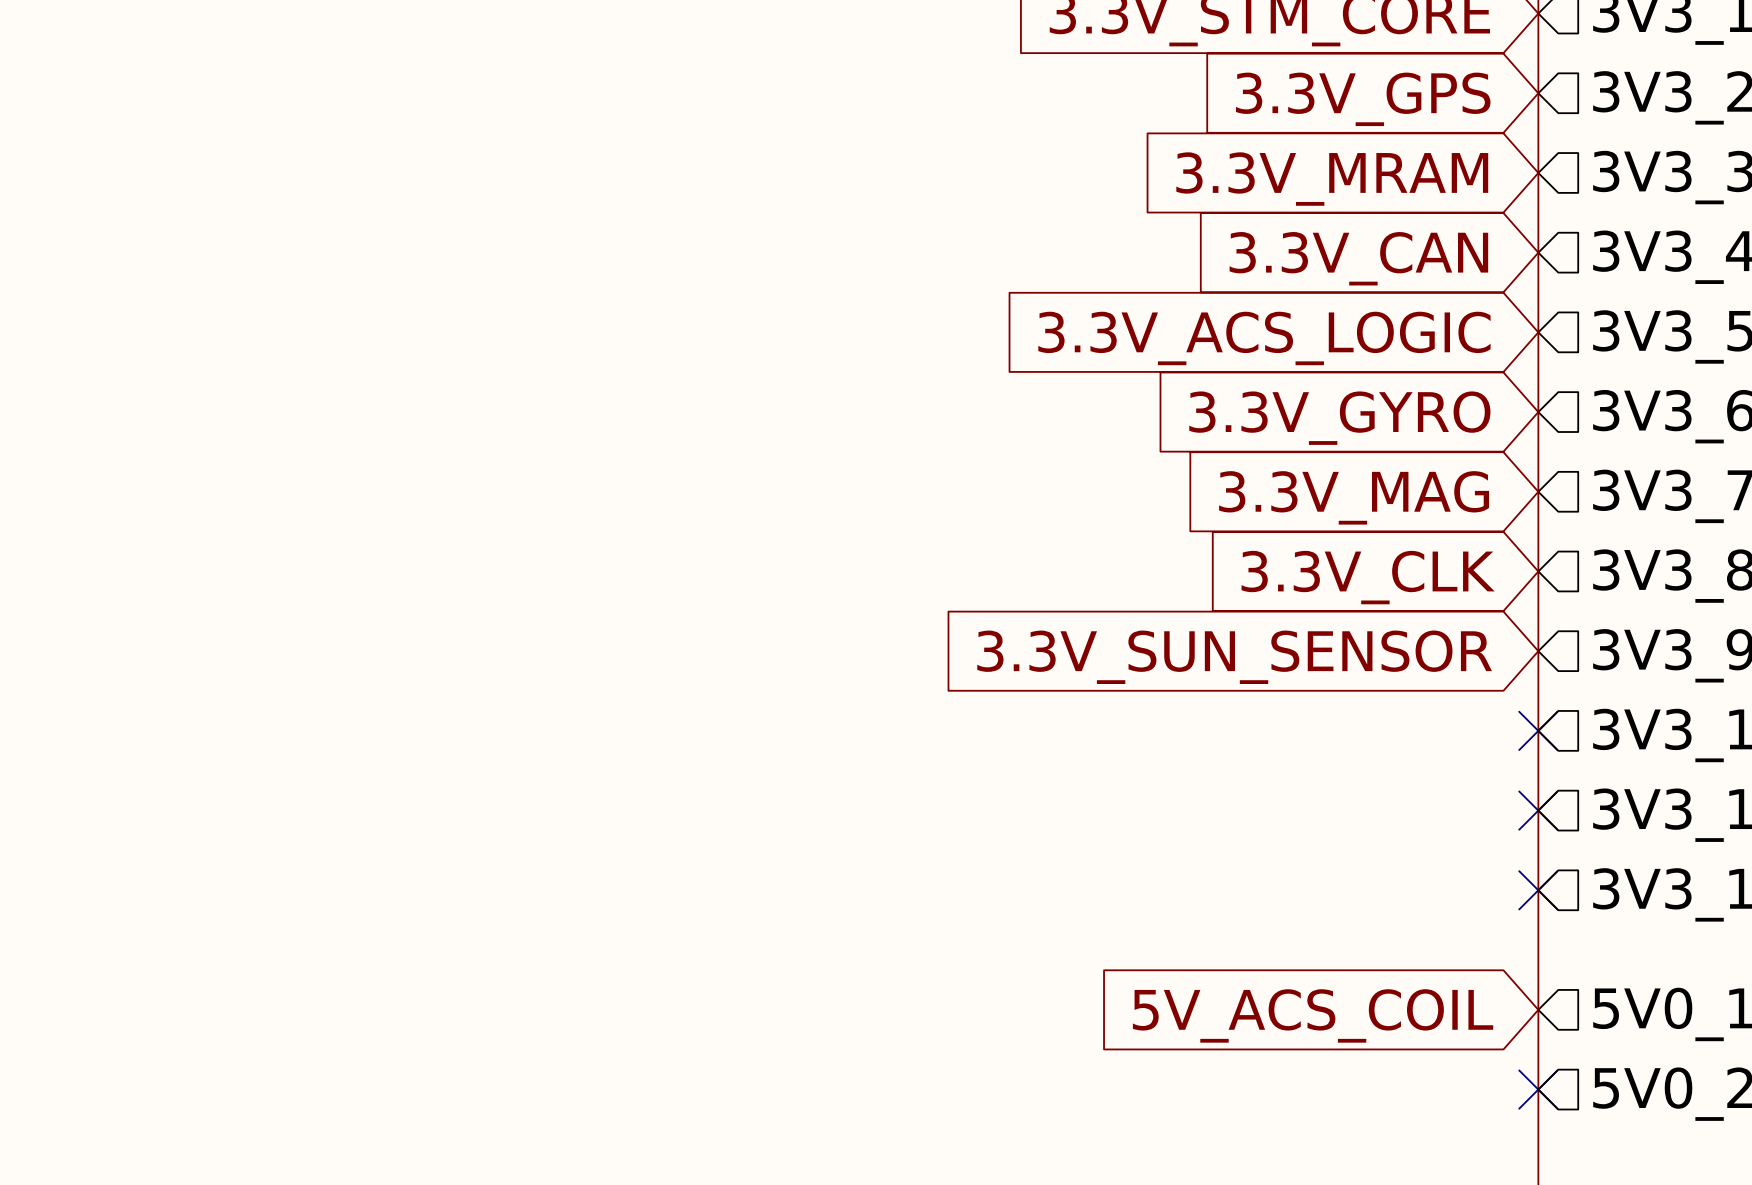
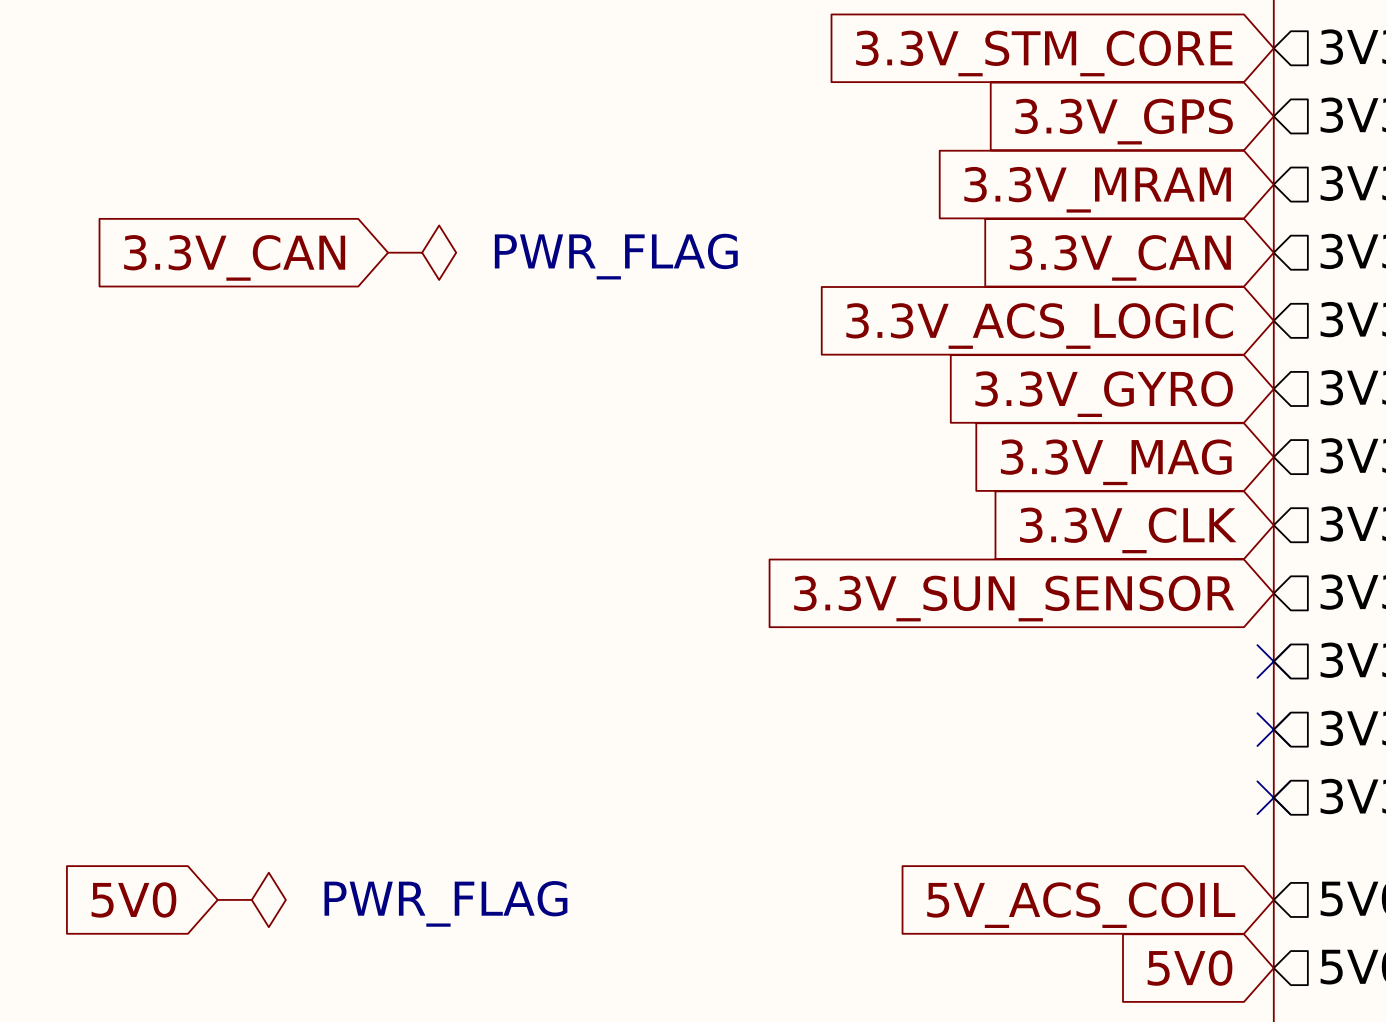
power symbol: none -> PWR_FLAG (422, 252)
global label: none -> 3.3V_CAN (234, 257)
global label: none -> 5V0 (133, 899)
power symbol: none -> PWR_FLAG (251, 899)
global label: none -> 5V0 (1190, 968)
no-connect mark: (1538, 1089) -> none

